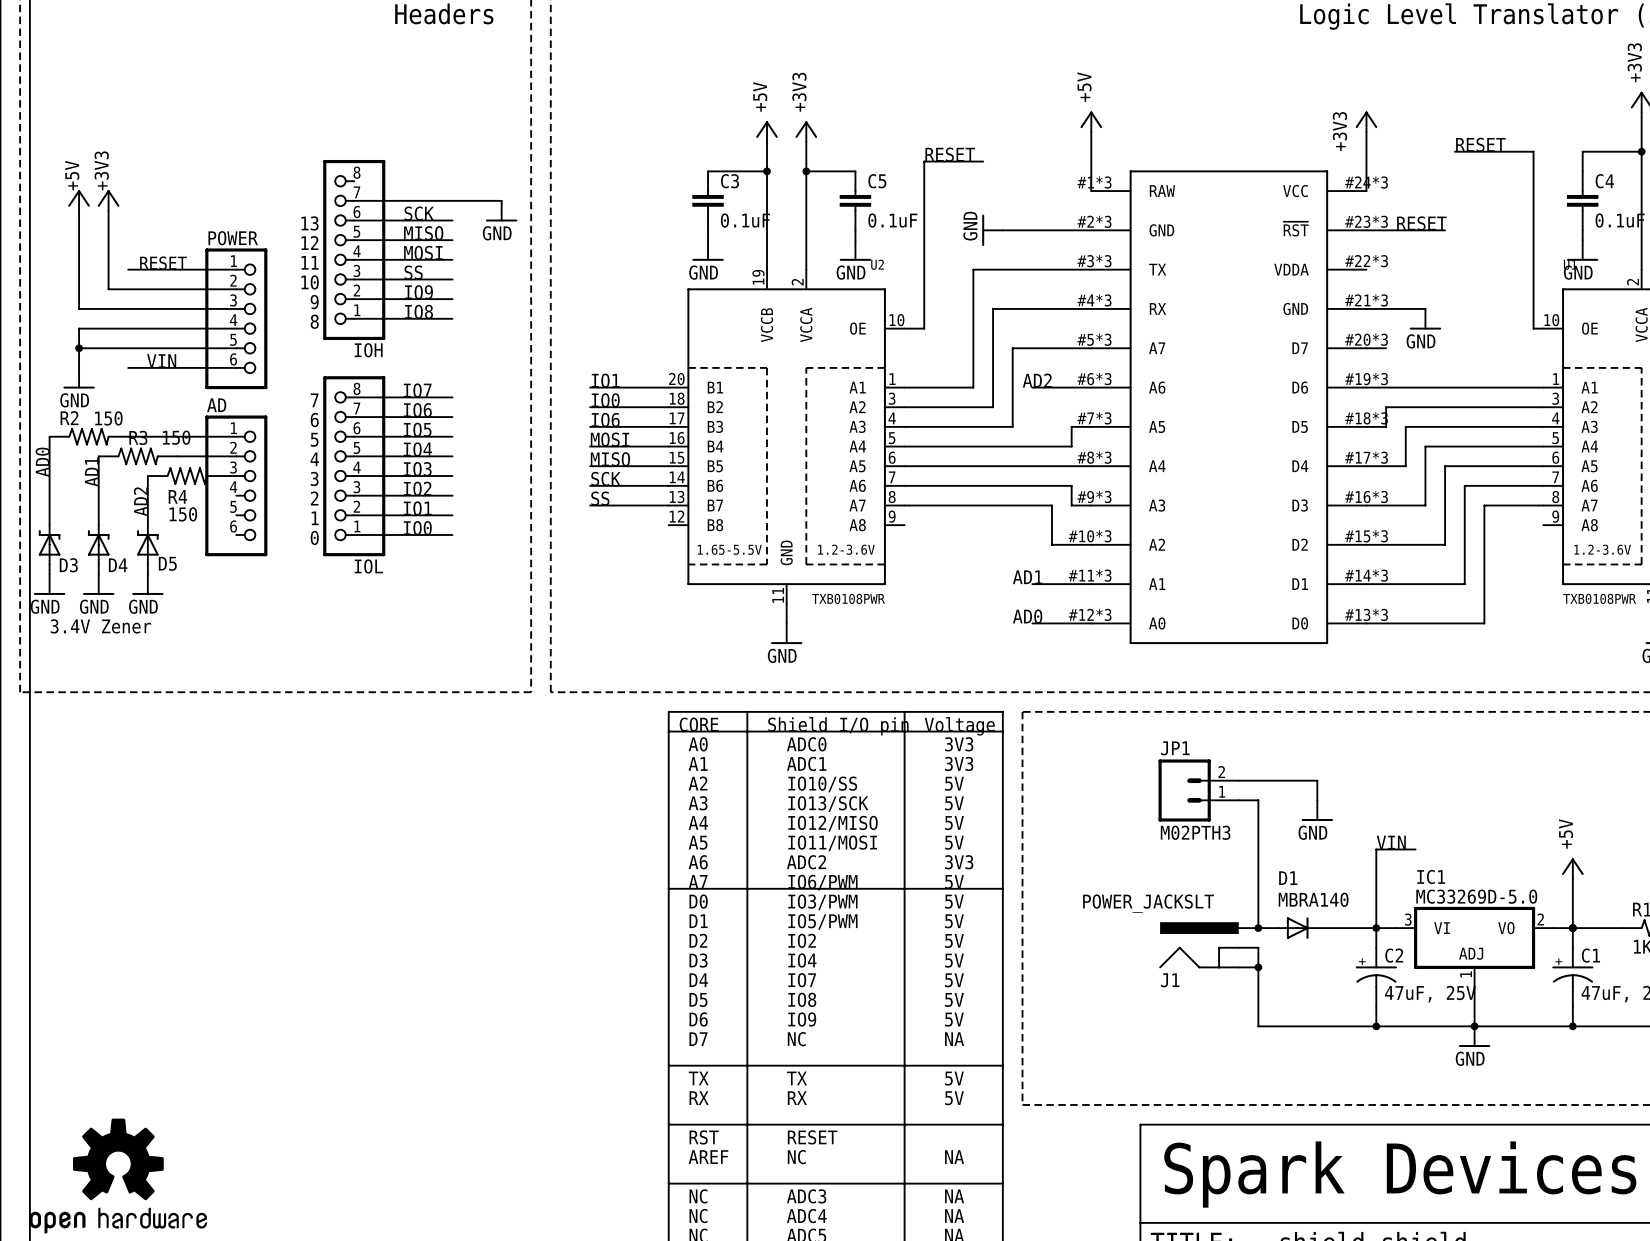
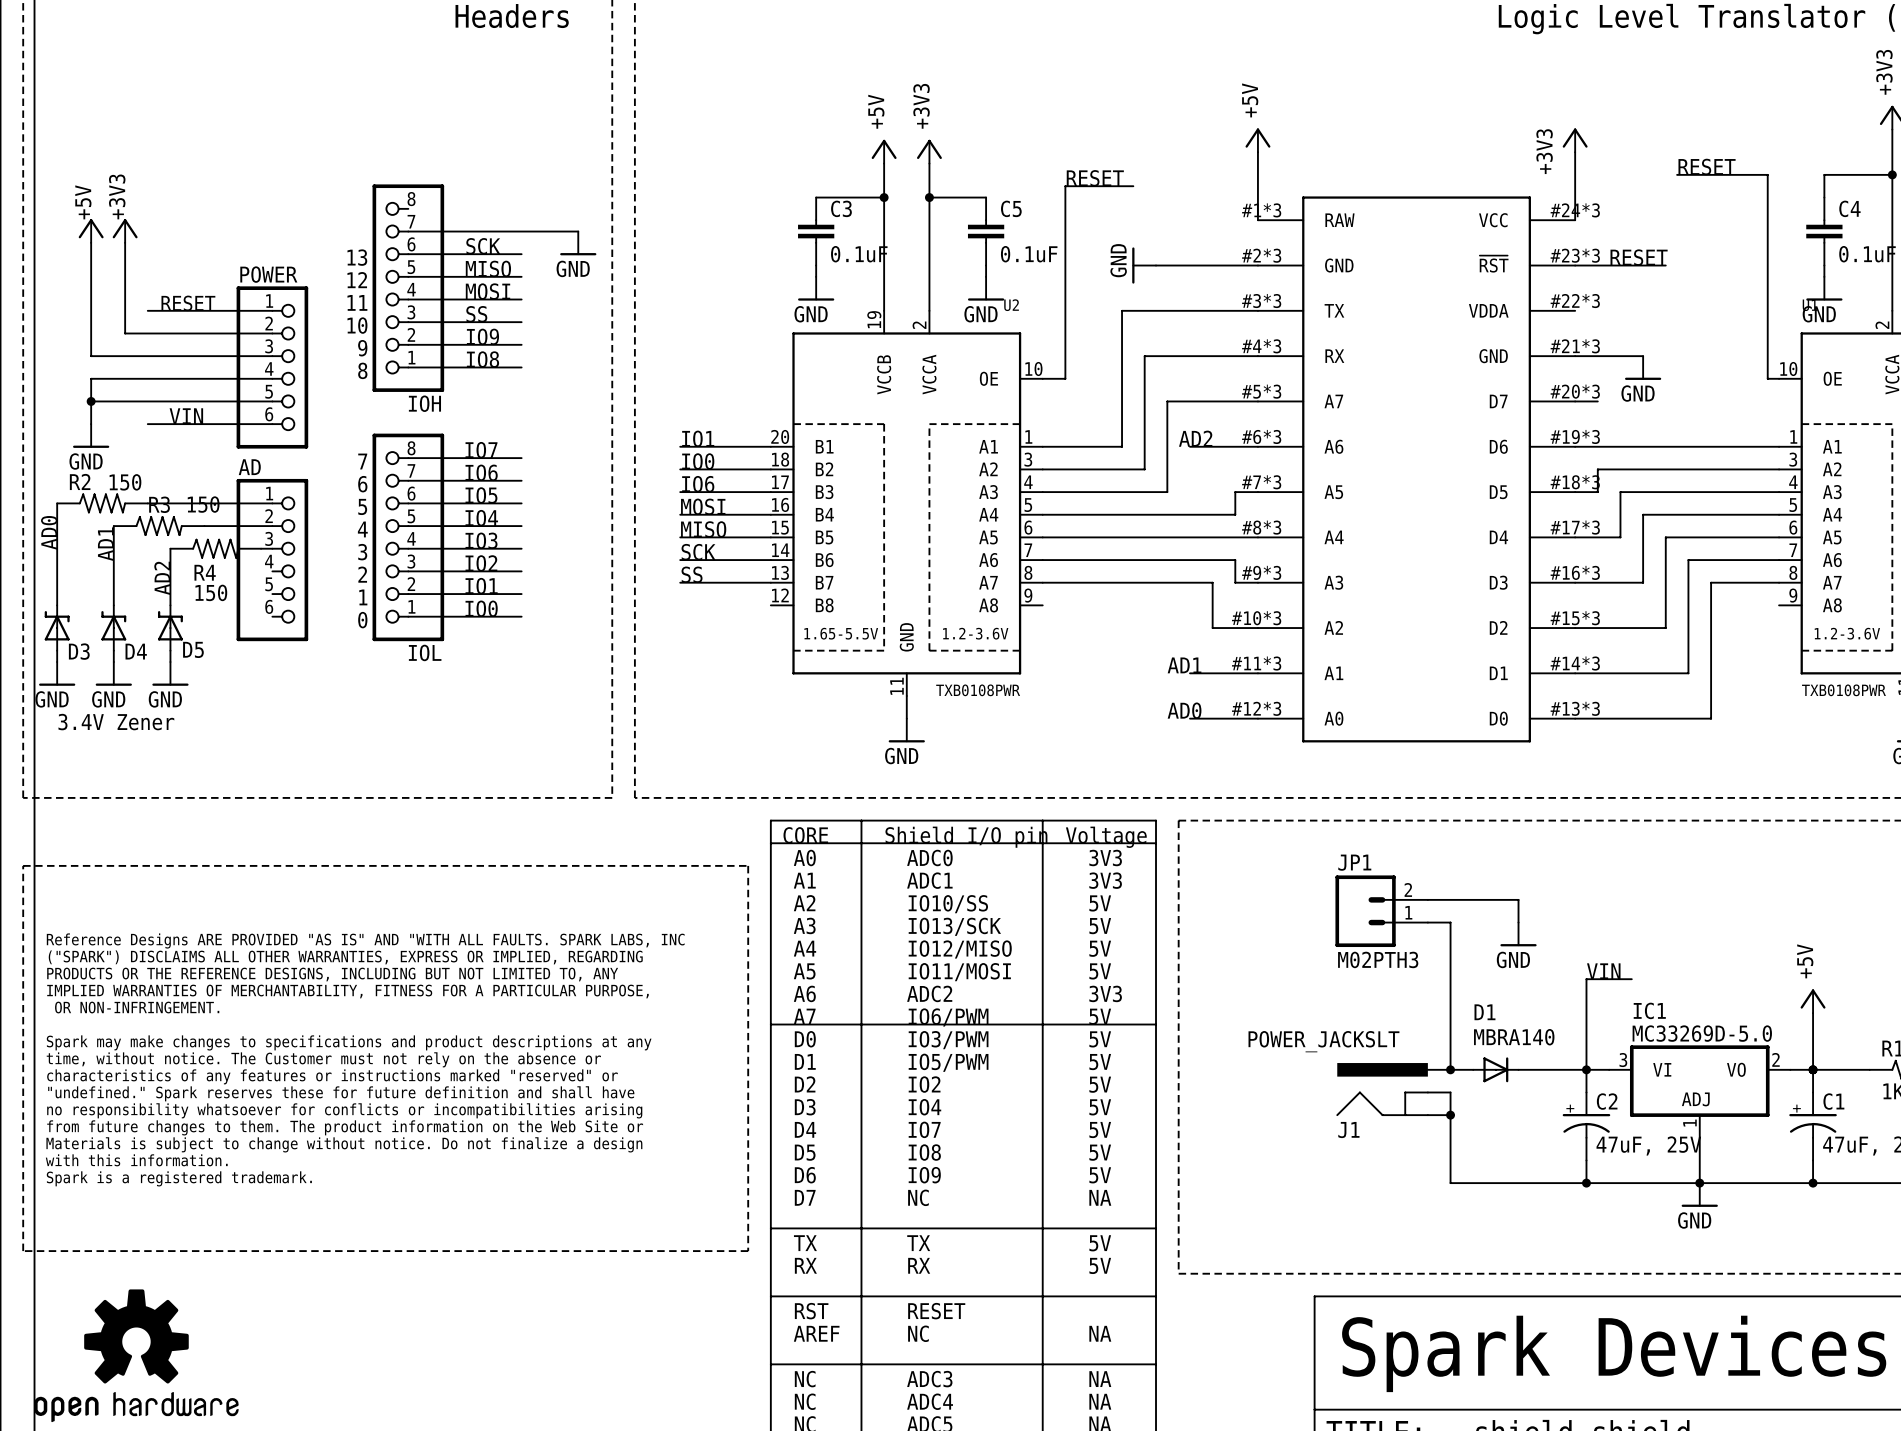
line: none -> (23, 865) (748, 865) (748, 1251) (23, 1251) (23, 865)
text: none -> Reference Designs ARE PROVIDED "AS IS" AND "WITH ALL FAULTS. SPARK LABS, INC (365, 940)
text: none -> ("SPARK") DISCLAIMS ALL OTHER WARRANTIES, EXPRESS OR IMPLIED, REGARDING (345, 957)
text: none -> PRODUCTS OR THE REFERENCE DESIGNS, INCLUDING BUT NOT LIMITED TO, ANY (332, 974)
text: none -> IMPLIED WARRANTIES OF MERCHANTABILITY, FITNESS FOR A PARTICULAR PURPOSE, (347, 991)
text: none -> OR NON-INFRINGEMENT. (137, 1007)
text: none -> Spark may make changes to specifications and product descriptions at any (349, 1042)
text: none -> time, without notice. The Customer must not rely on the absence or (323, 1059)
text: none -> characteristics of any features or instructions marked "reserved" or (332, 1076)
text: none -> "undefined." Spark reserves these for future definition and shall have (341, 1093)
text: none -> no responsibility whatsoever for conflicts or incompatibilities arising (344, 1110)
text: none -> from future changes to them. The product information on the Web Site or (345, 1127)
text: none -> Materials is subject to change without notice. Do not finalize a design (344, 1144)
text: none -> with this information. (136, 1160)
text: none -> Spark is a registered trademark. (179, 1178)

